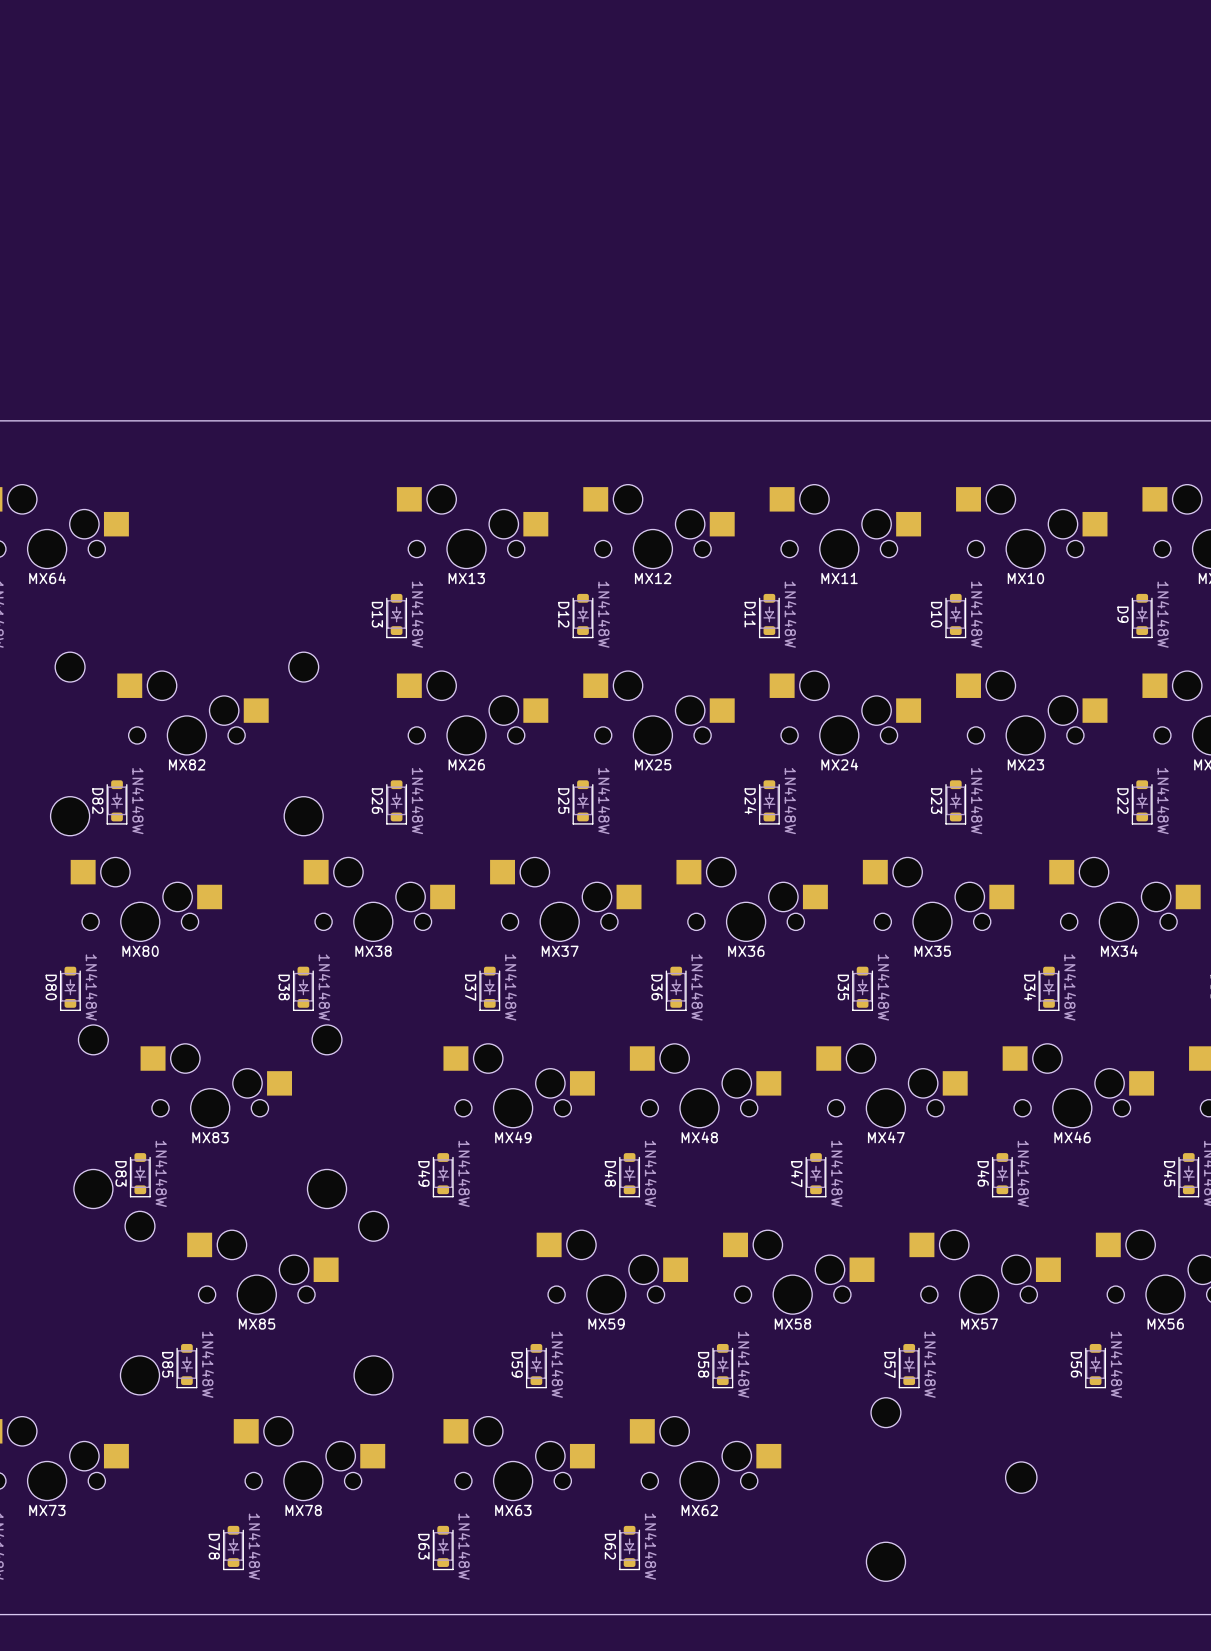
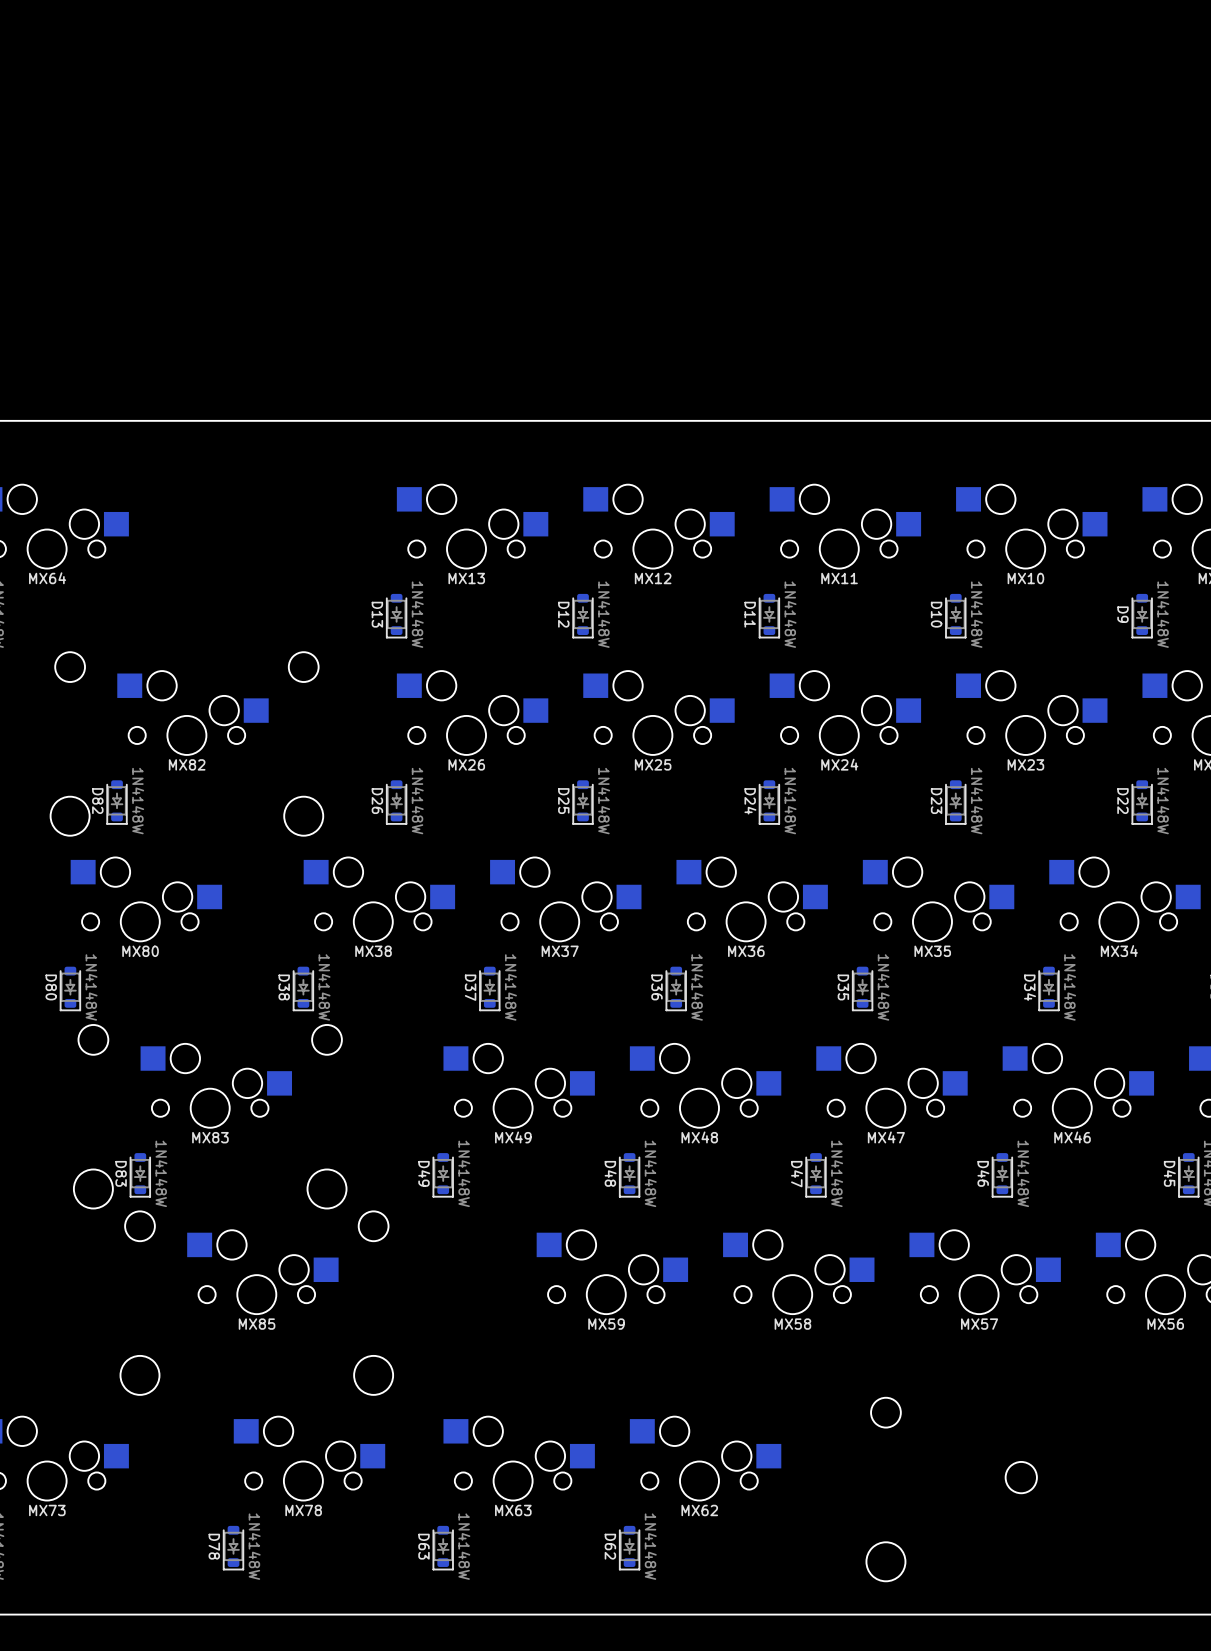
D85: 1N4148W (186, 1366) -> none
D59: 1N4148W (536, 1366) -> none
D58: 1N4148W (722, 1366) -> none
D57: 1N4148W (909, 1366) -> none
D56: 1N4148W (1095, 1366) -> none

